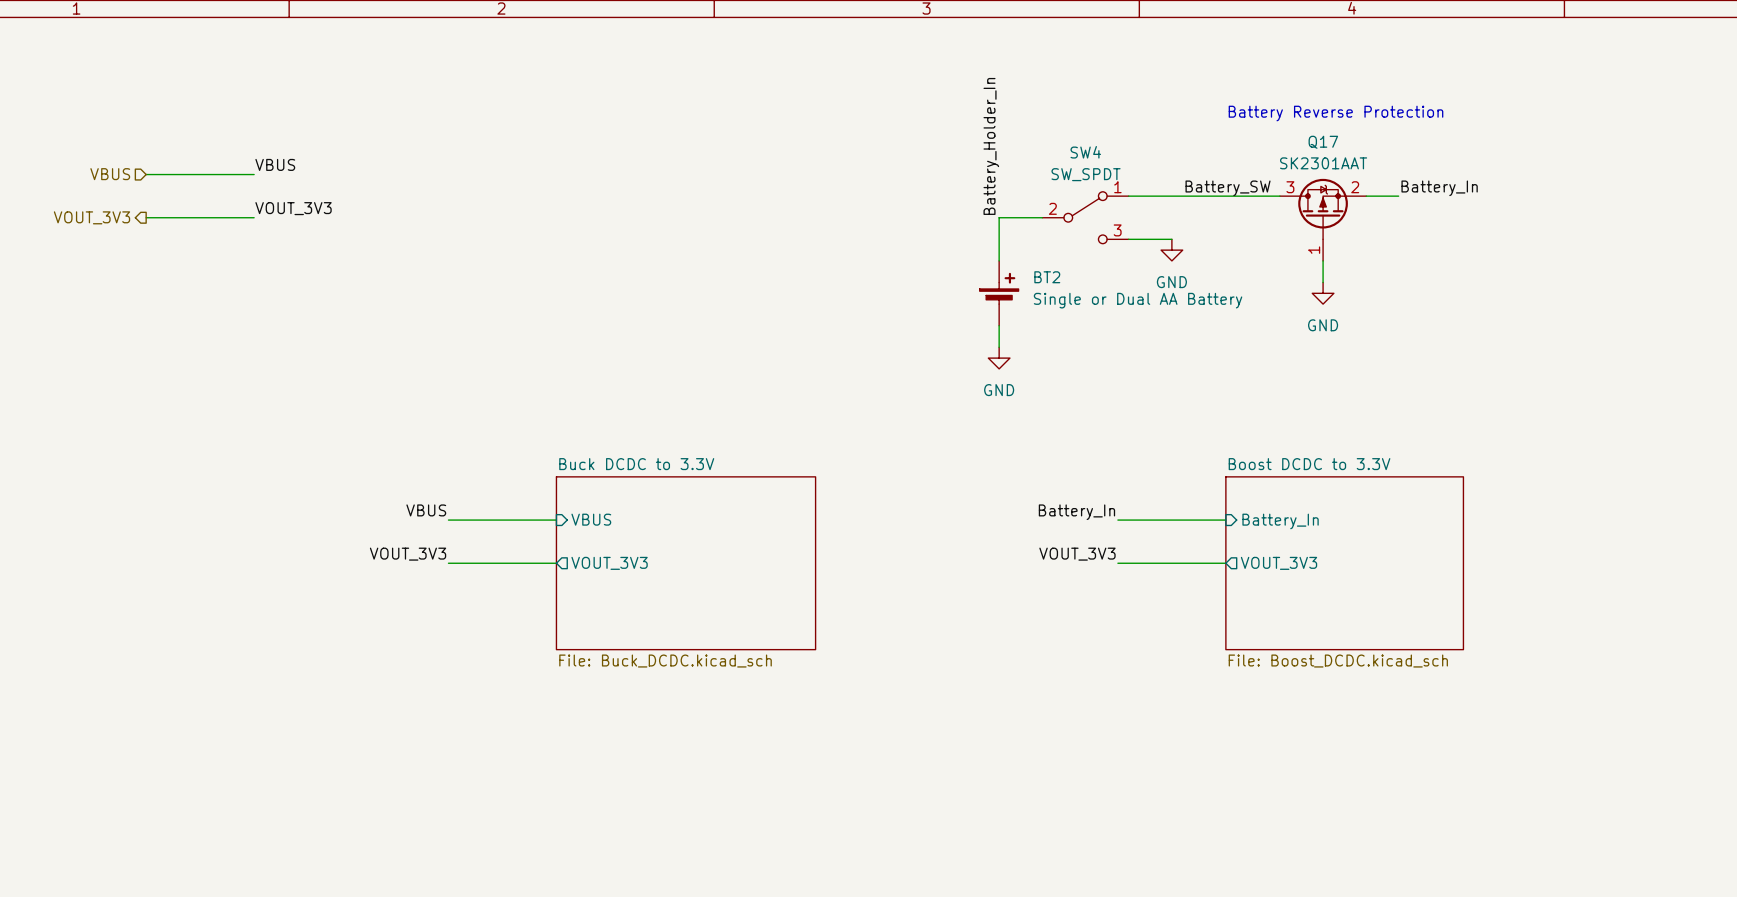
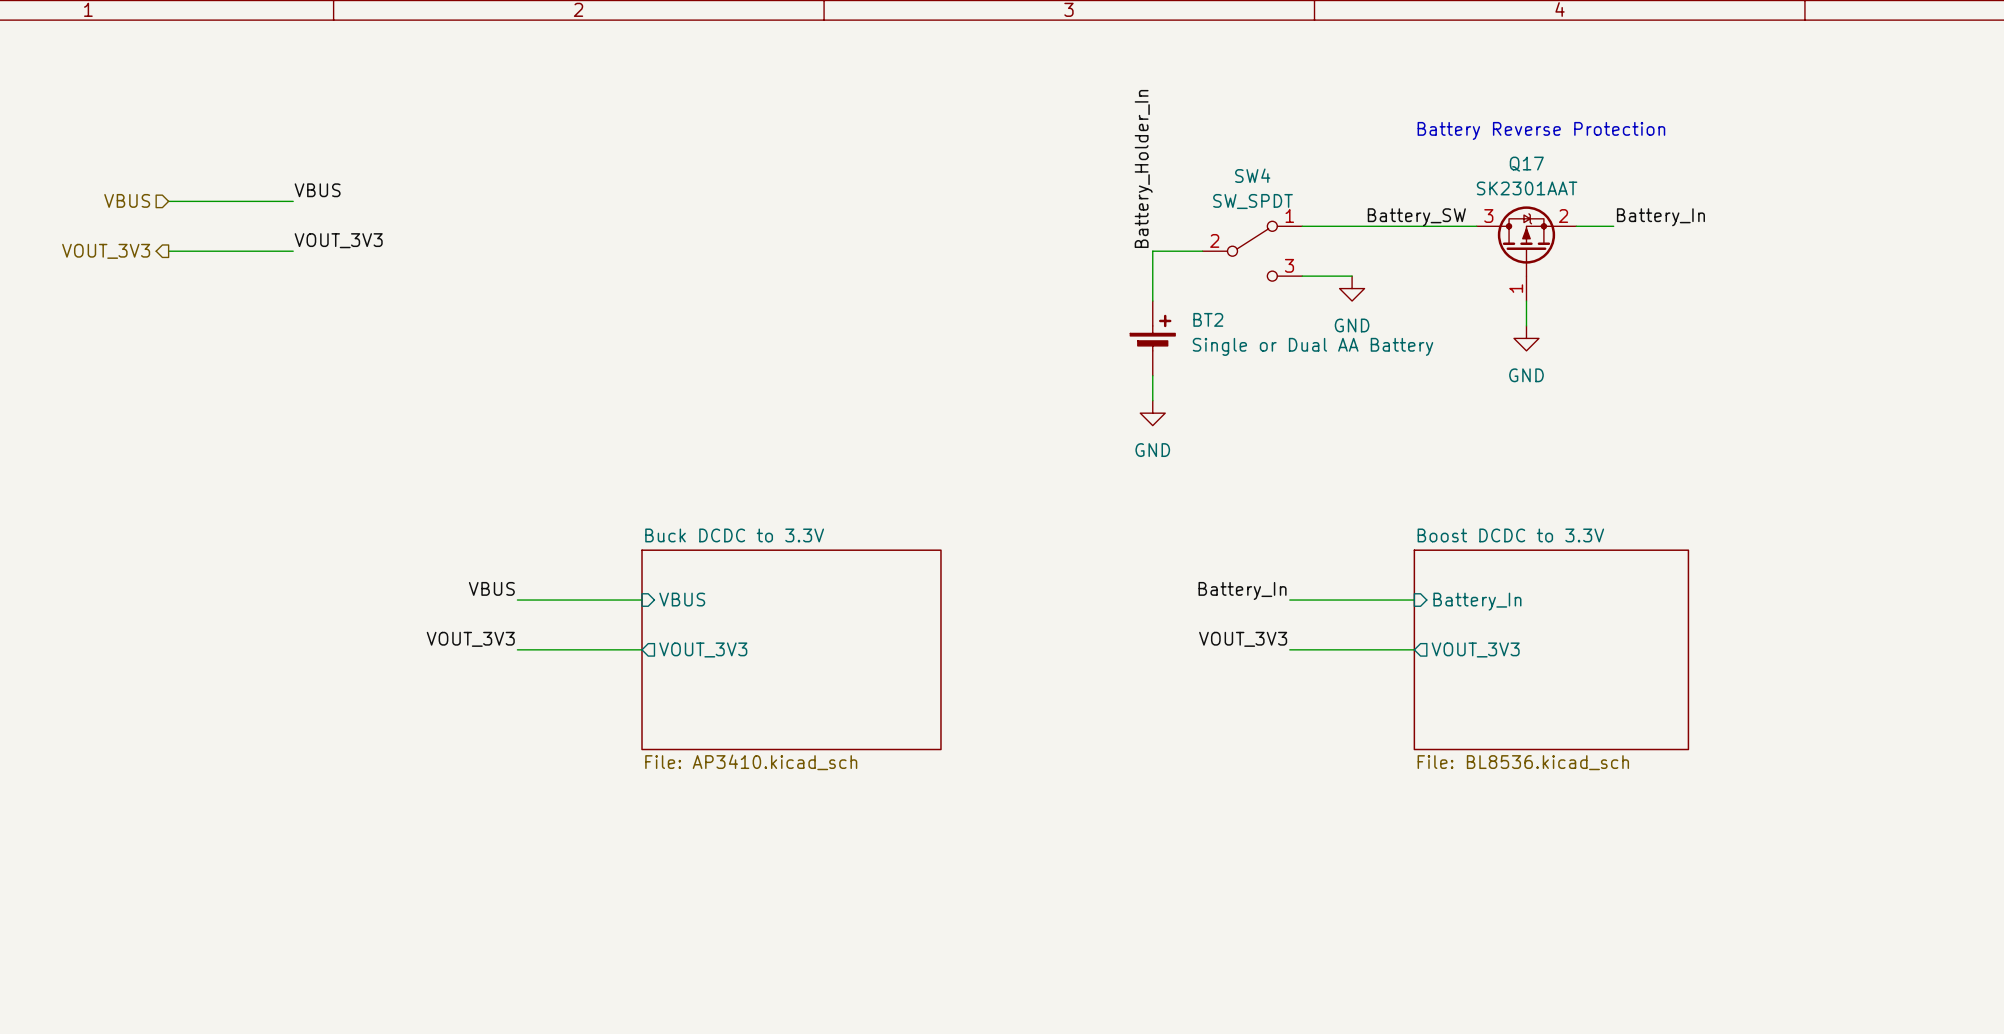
sheet Buck DCDC to 3.3V value: File: Buck_DCDC.kicad_sch (665, 661) -> File: AP3410.kicad_sch (751, 762)
sheet Boost DCDC to 3.3V value: File: Boost_DCDC.kicad_sch (1338, 661) -> File: BL8536.kicad_sch (1523, 762)

